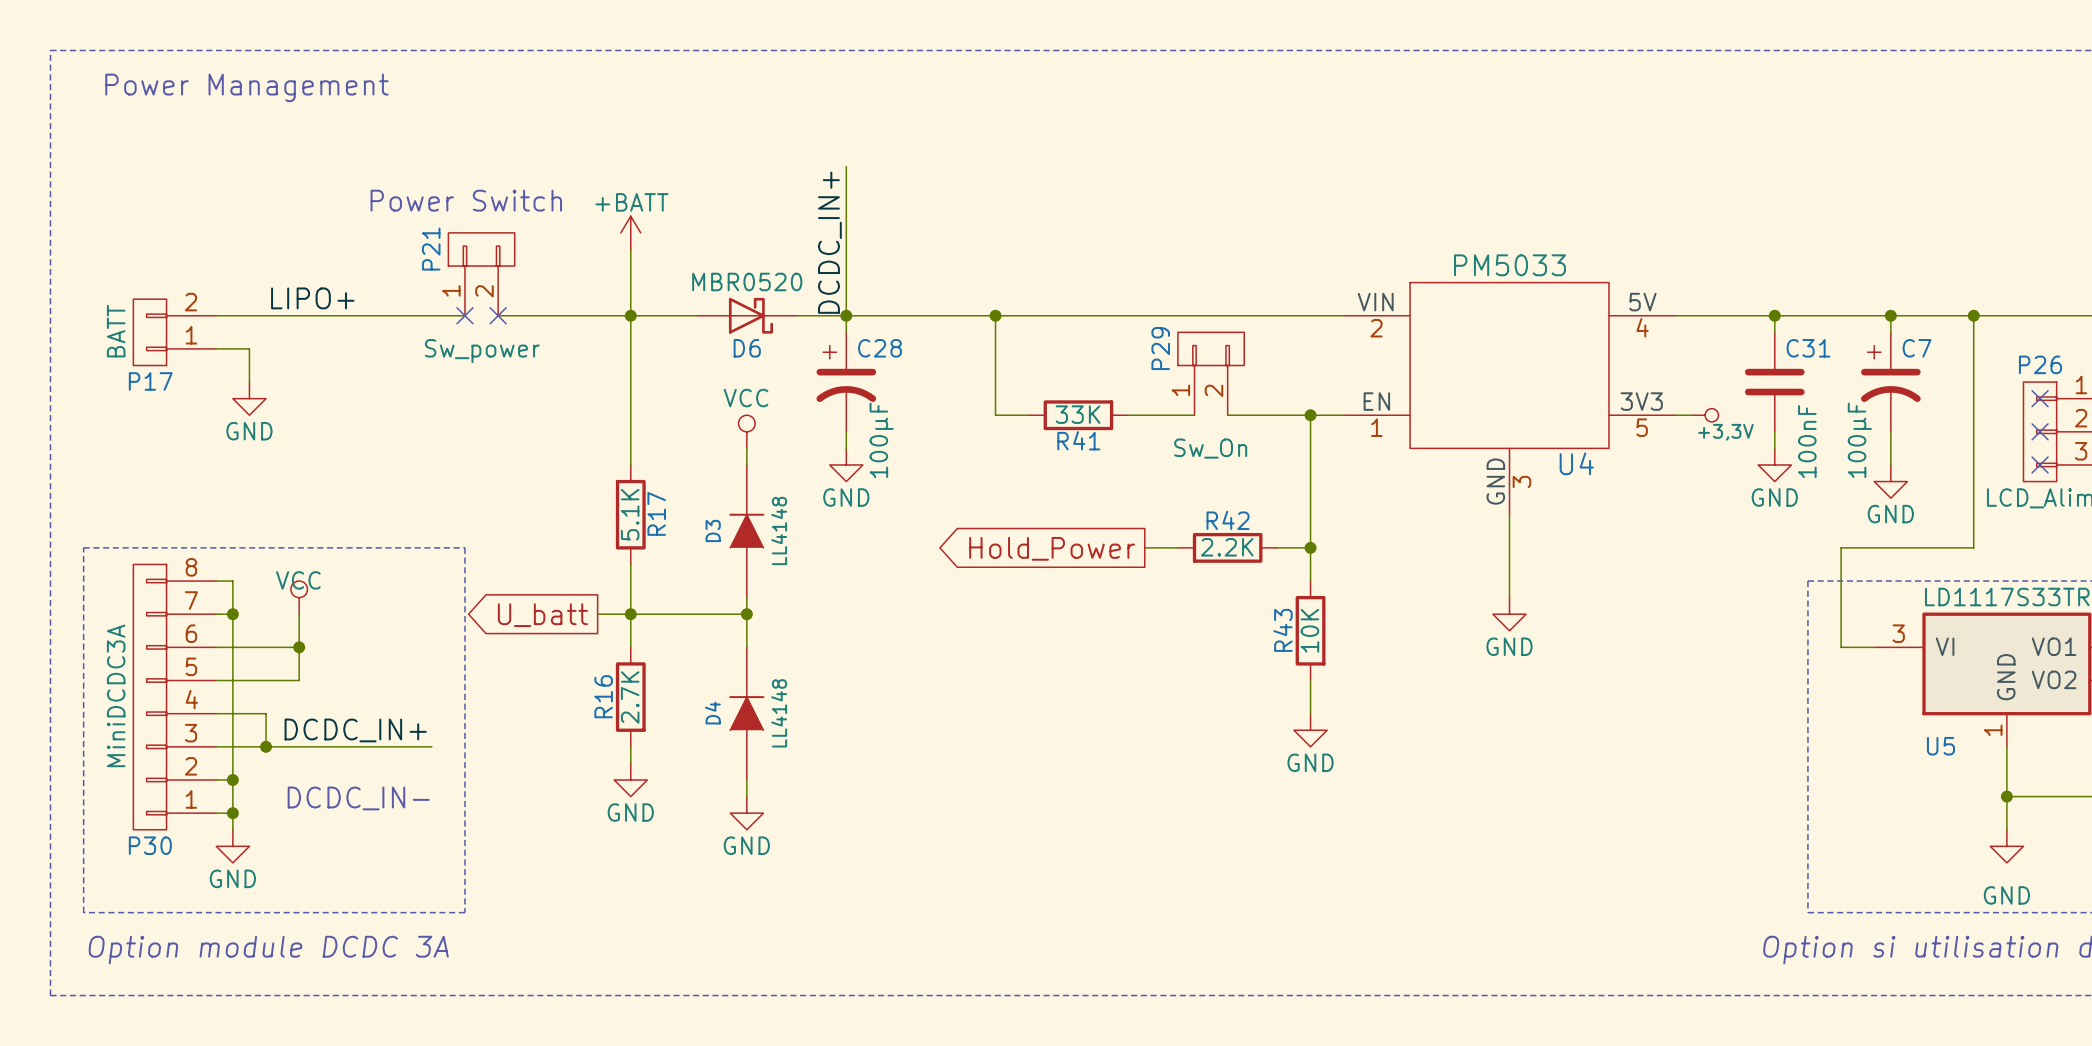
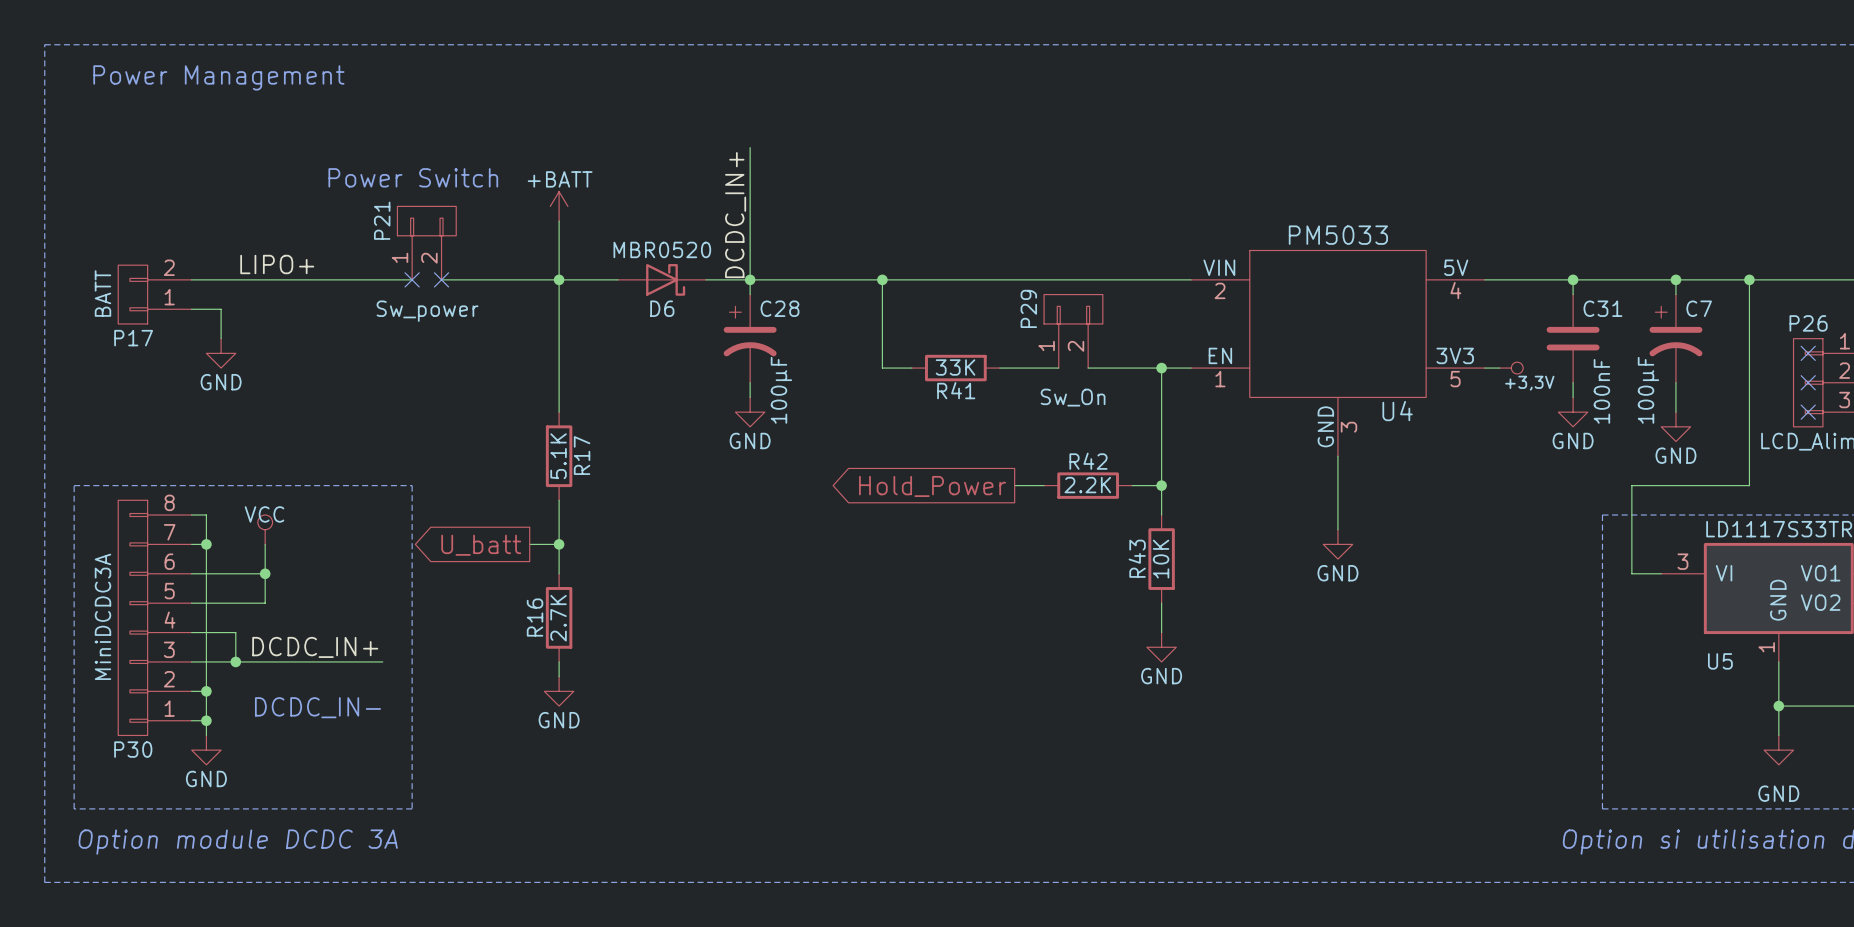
power symbol: VCC (746, 431) -> none
wire: (746, 448) (746, 464) -> none
D3: LL4148 (746, 531) -> none
wire: (746, 597) (746, 647) -> none
wire: (630, 614) (746, 614) -> none
junction: (746, 614) -> none
D4: LL4148 (746, 713) -> none
wire: (746, 780) (746, 796) -> none
power symbol: GND (746, 813) -> none

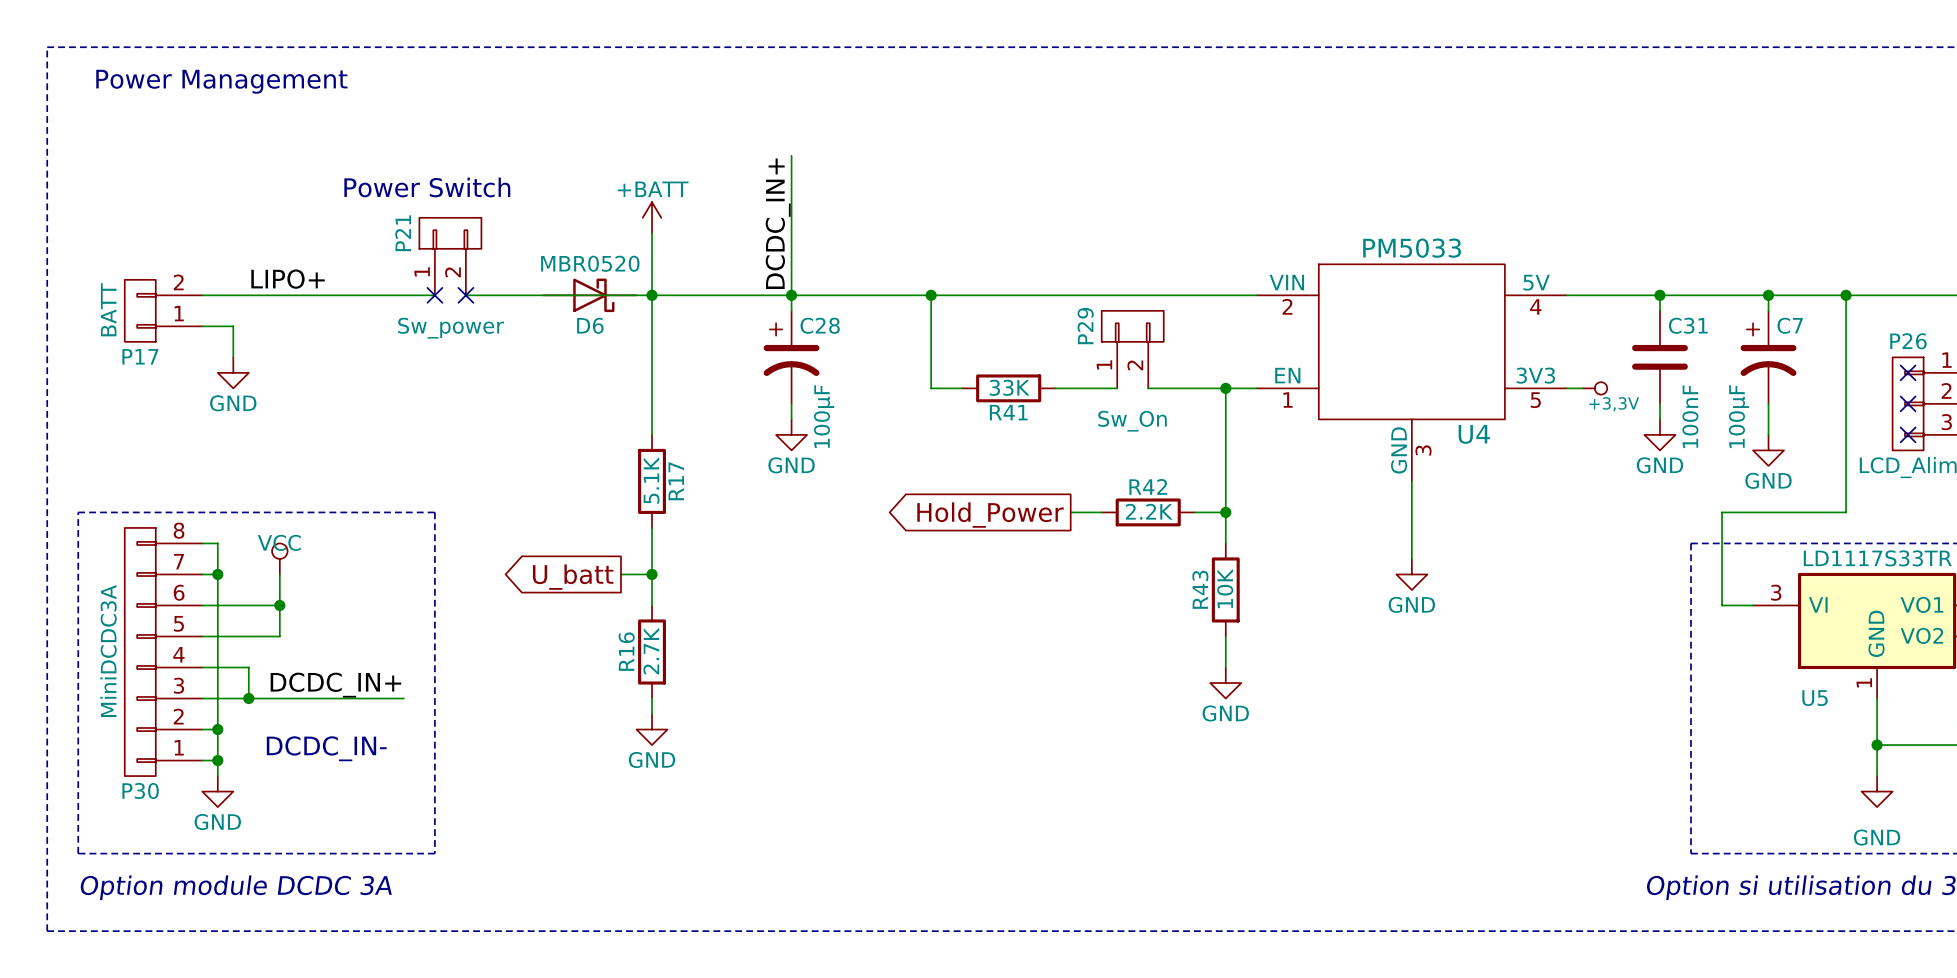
power symbol position: +BATT (559, 206) -> +BATT (652, 217)
wire: (559, 221) (559, 412) -> (652, 233) (652, 434)
junction position: (559, 279) -> (652, 295)
D6 position: (661, 279) -> (589, 295)
R17 position: (559, 456) -> (652, 481)
wire: (559, 500) (559, 573) -> (652, 527) (652, 605)
wire: (529, 544) (559, 544) -> (620, 574) (652, 574)
junction position: (559, 544) -> (652, 574)
global label position: U_batt (481, 545) -> U_batt (573, 577)
R16 position: (559, 617) -> (652, 652)
wire: (559, 661) (559, 676) -> (652, 698) (652, 714)
power symbol position: GND (559, 691) -> GND (652, 729)

